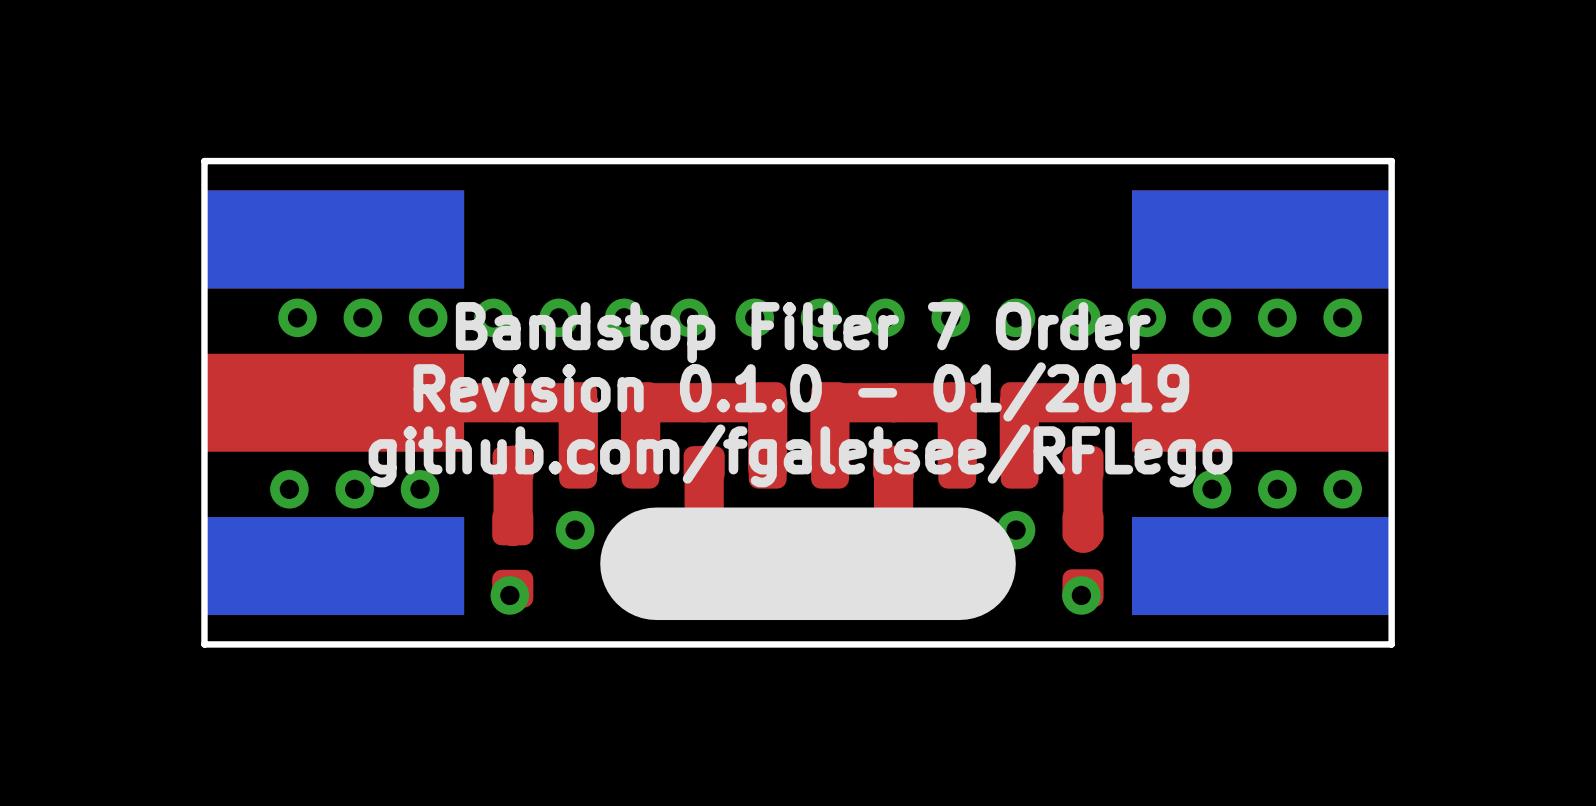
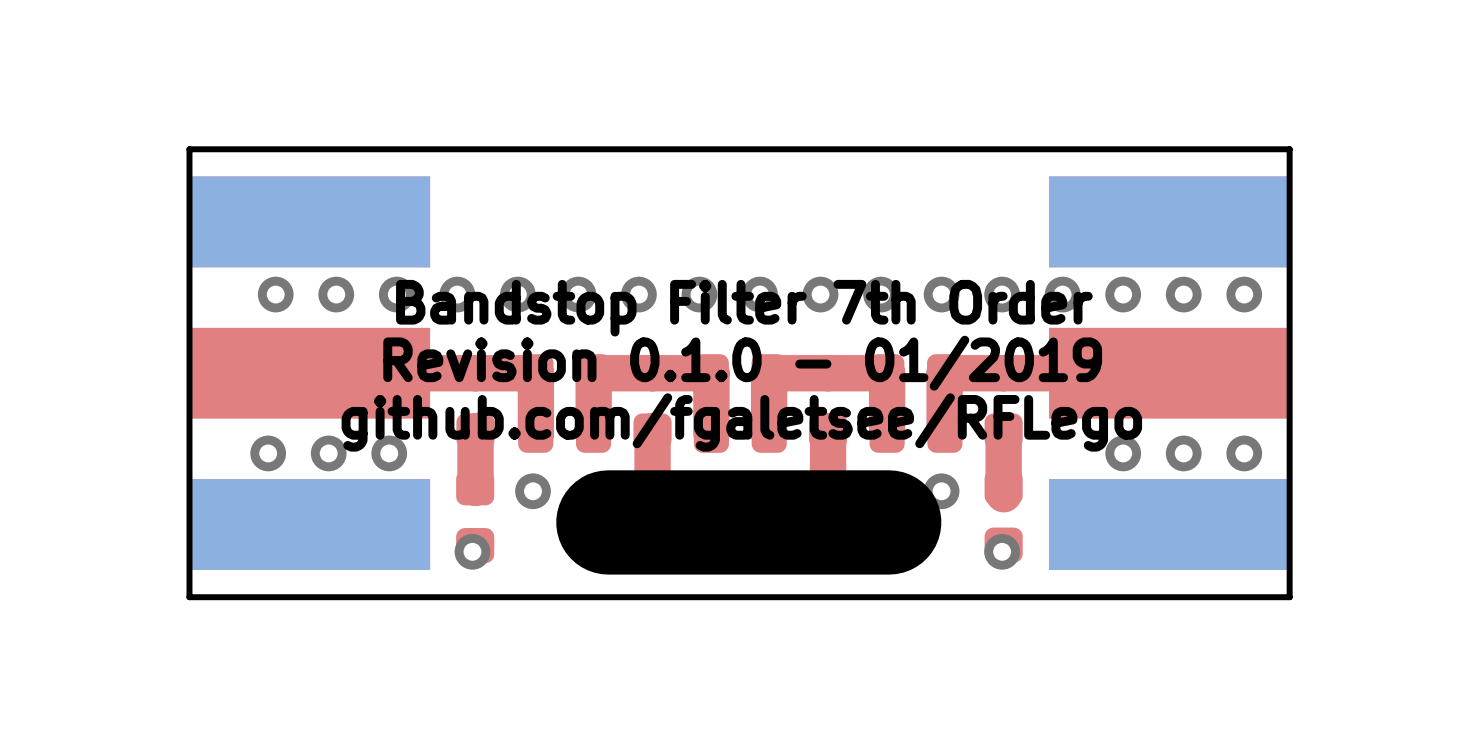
text: Bandstop Filter 7 Order (803, 332) -> Bandstop Filter 7th Order (744, 308)

